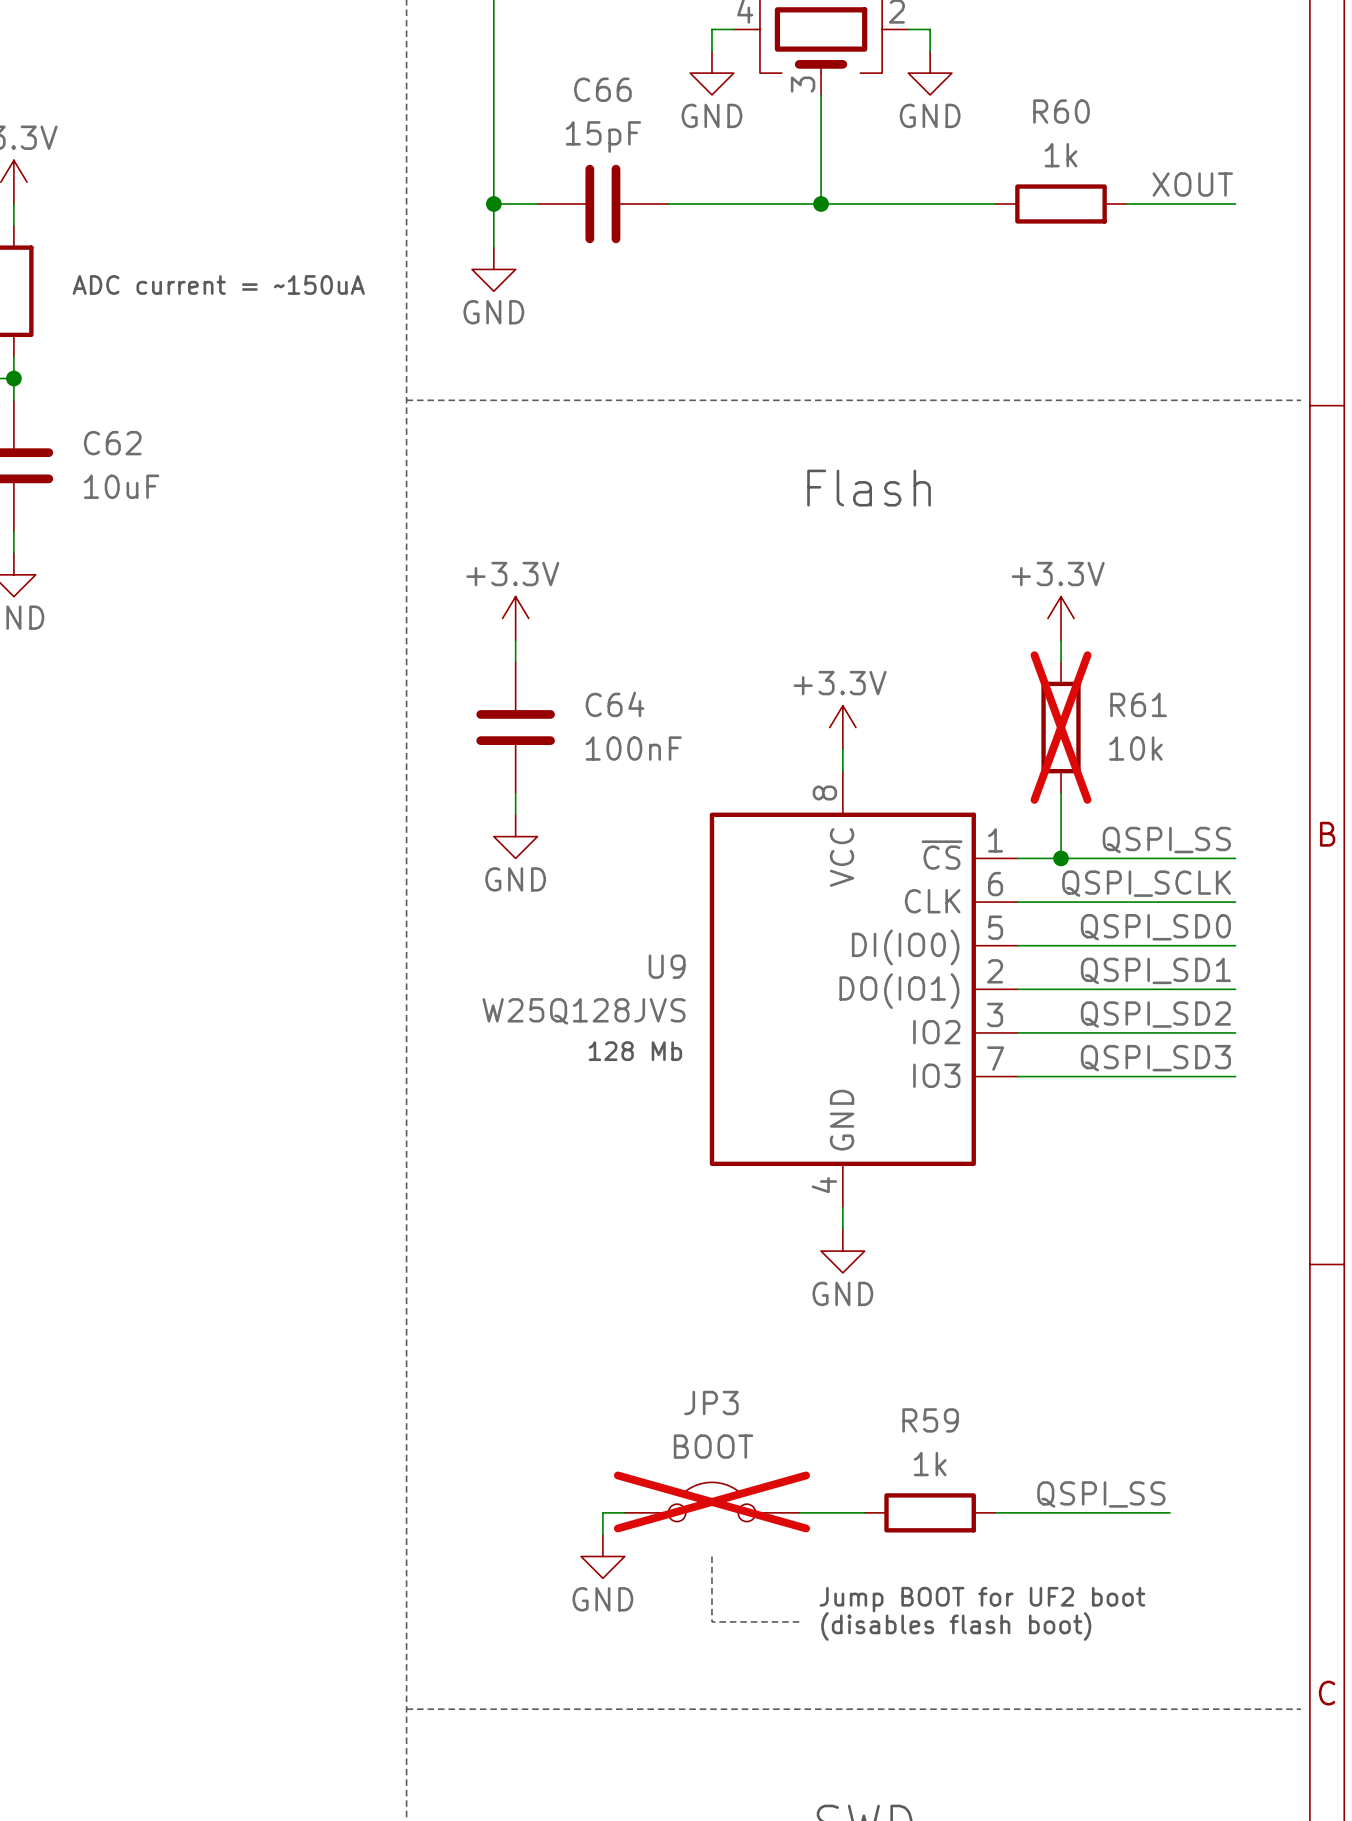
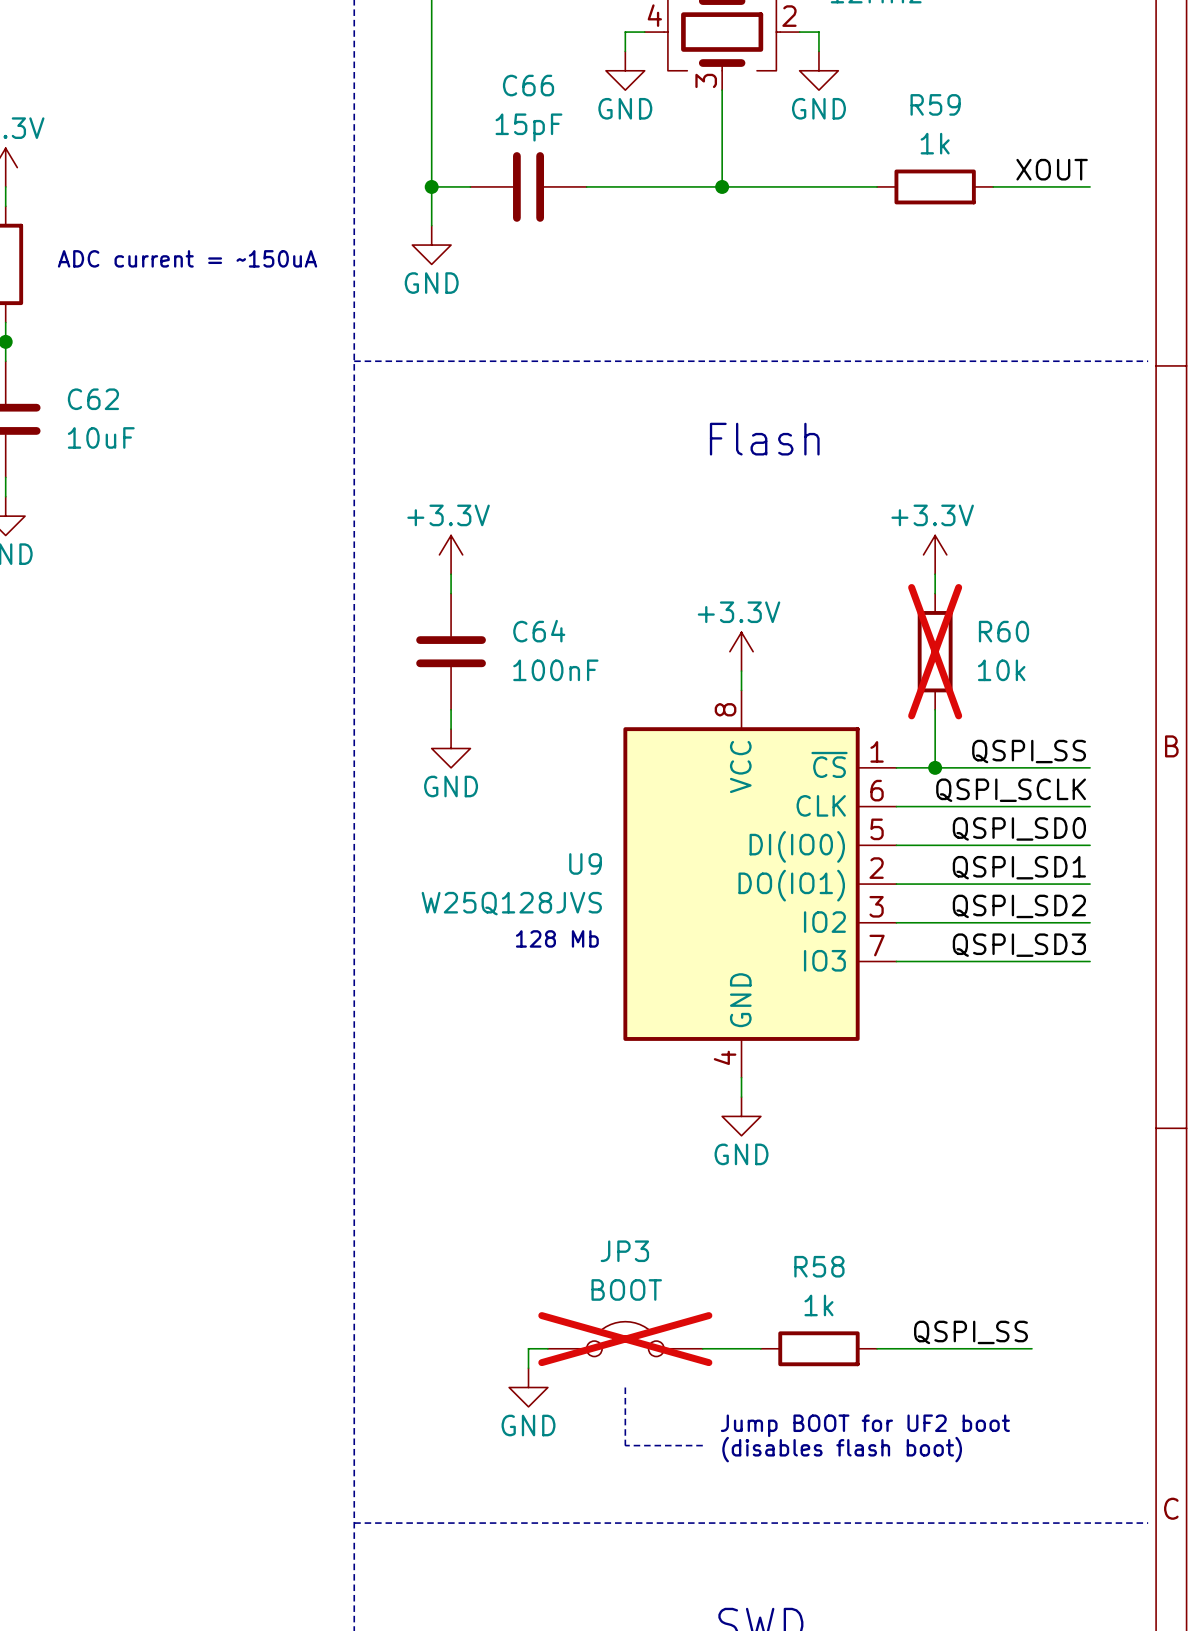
R60 name: R60 (1061, 111) -> R59 (935, 104)
R61 name: R61 (1138, 704) -> R60 (1003, 631)
R59 name: R59 (930, 1420) -> R58 (819, 1266)

